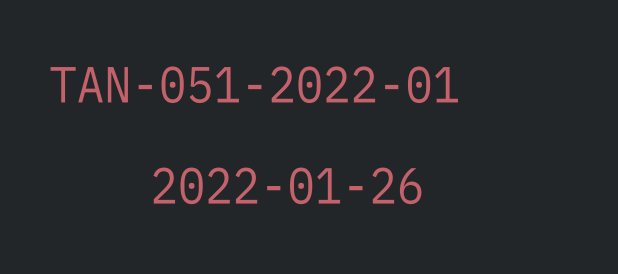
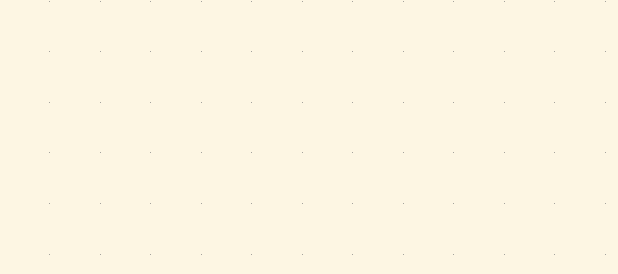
text: TAN-051-2022-01 (254, 84) -> none
text: 2022-01-26 (287, 185) -> none

